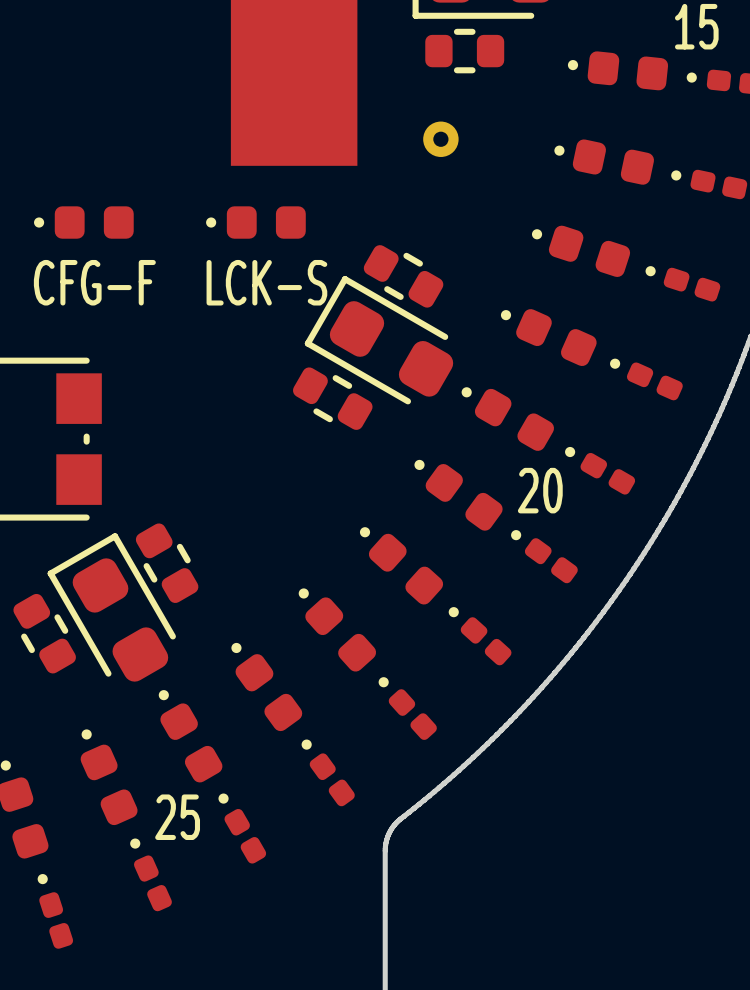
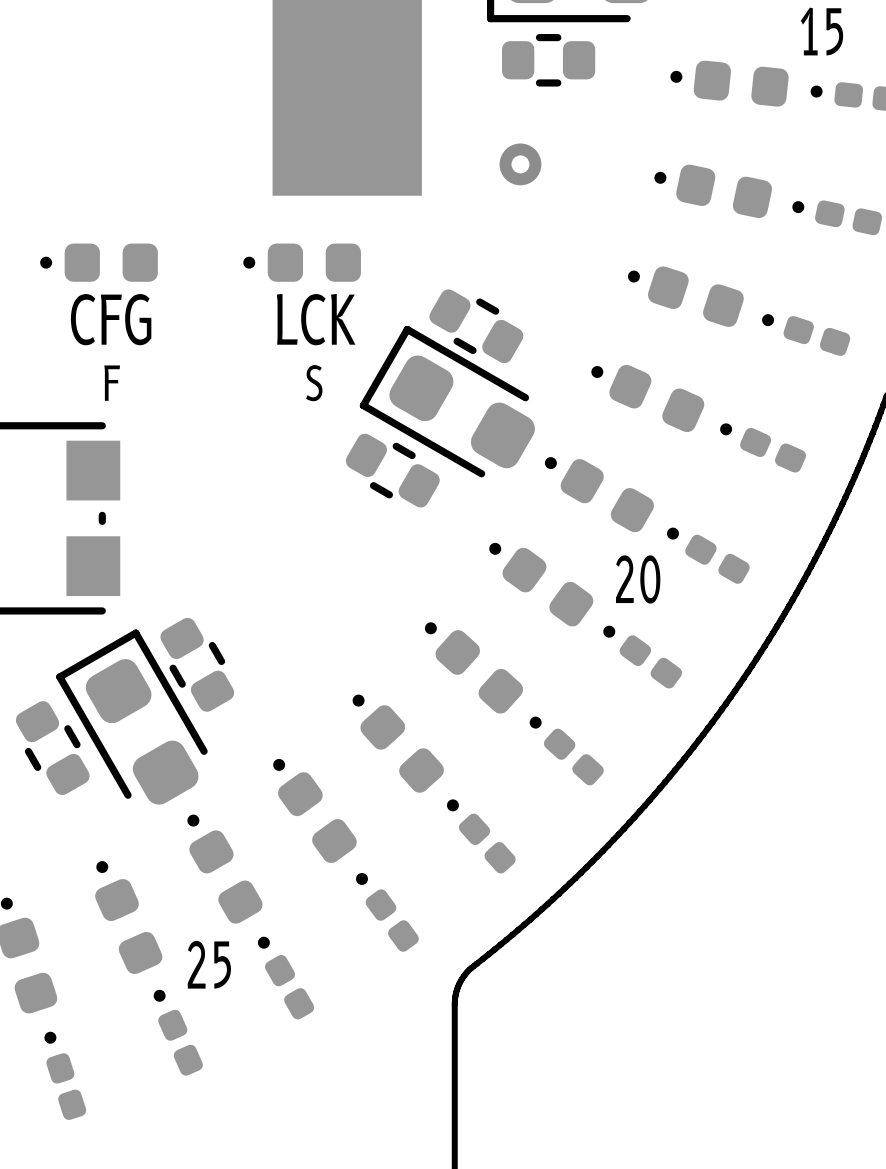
text: CFG-F (94, 282) -> CFG (111, 319)
text: LCK-S (266, 282) -> LCK (316, 319)
text: none -> F (112, 383)
text: none -> S (314, 383)

